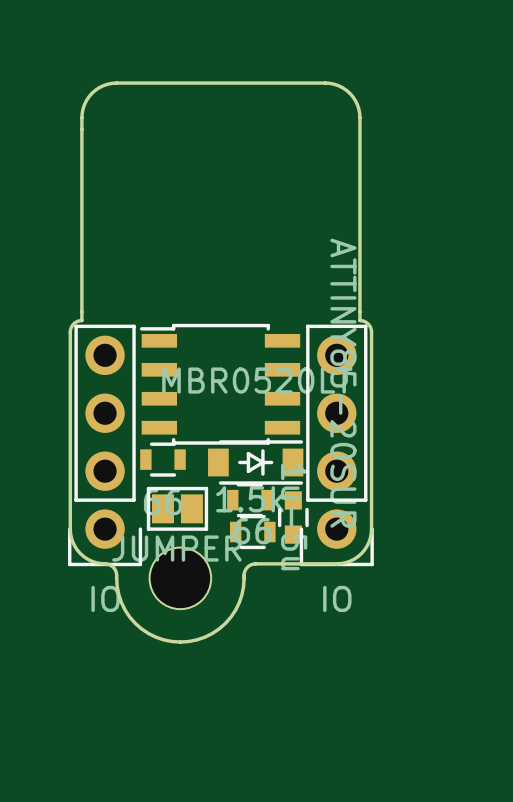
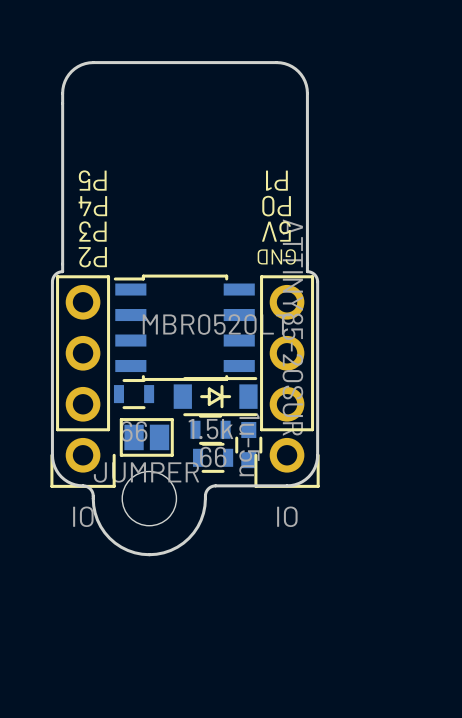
text: none -> P5 (92, 180)
text: none -> P1 (276, 180)
text: none -> P4 (92, 206)
text: none -> P0 (276, 206)
text: none -> P3 (92, 231)
text: none -> 5V (276, 231)
text: none -> GND (276, 256)
text: none -> P2 (92, 257)

